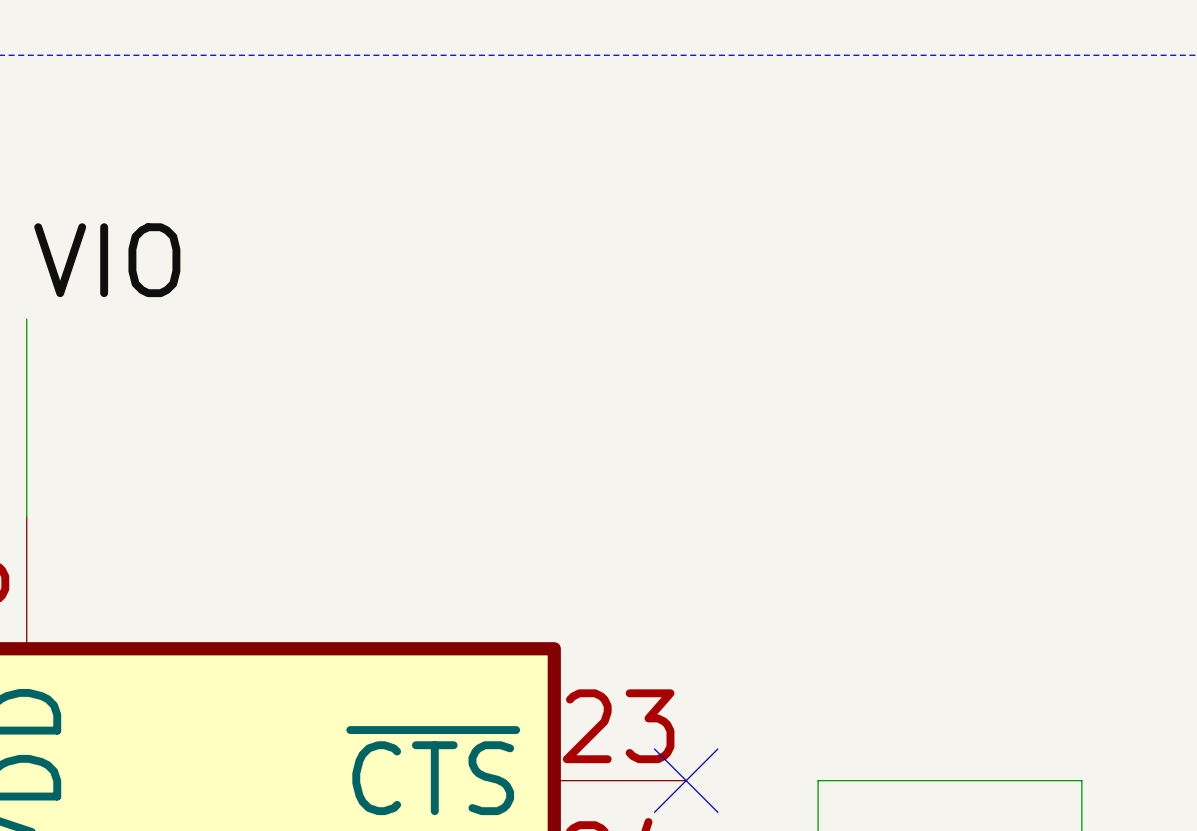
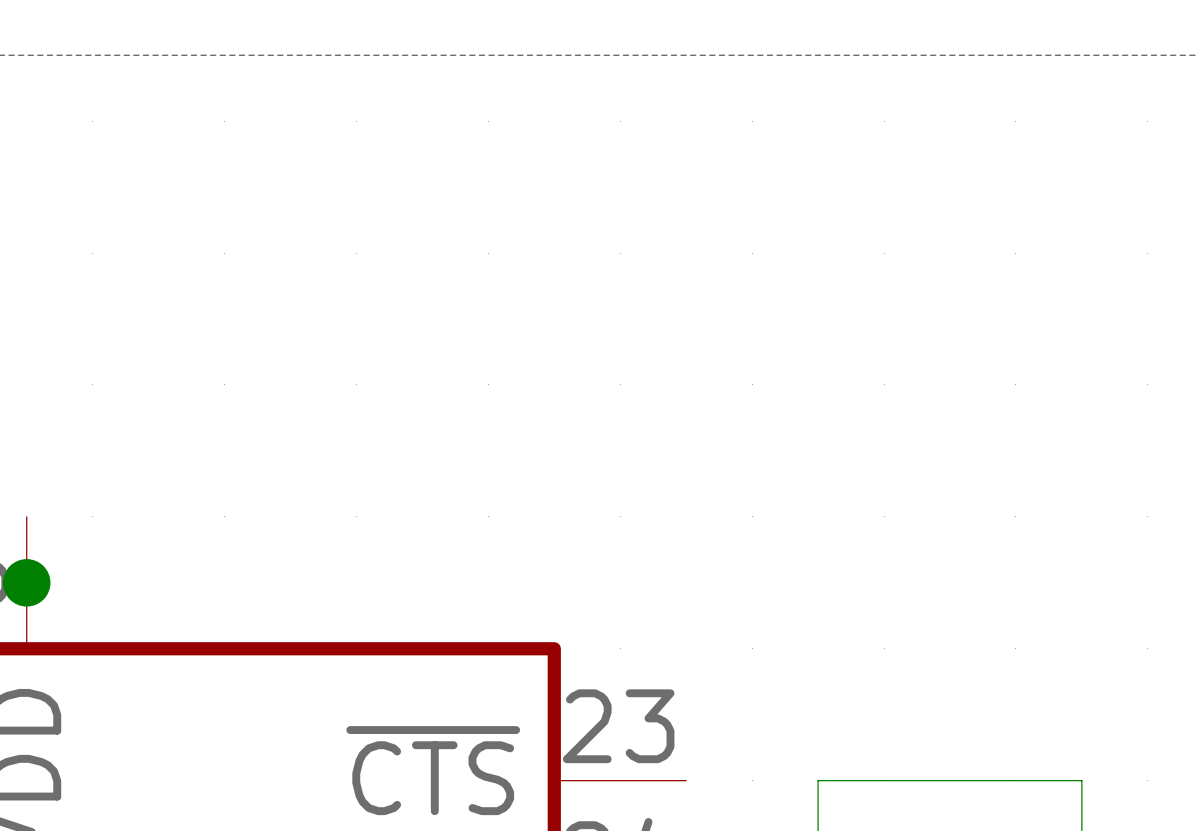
label: VIO (107, 260) -> none
wire: (26, 319) (26, 516) -> none
junction: none -> (26, 582)
no-connect mark: (686, 780) -> none

